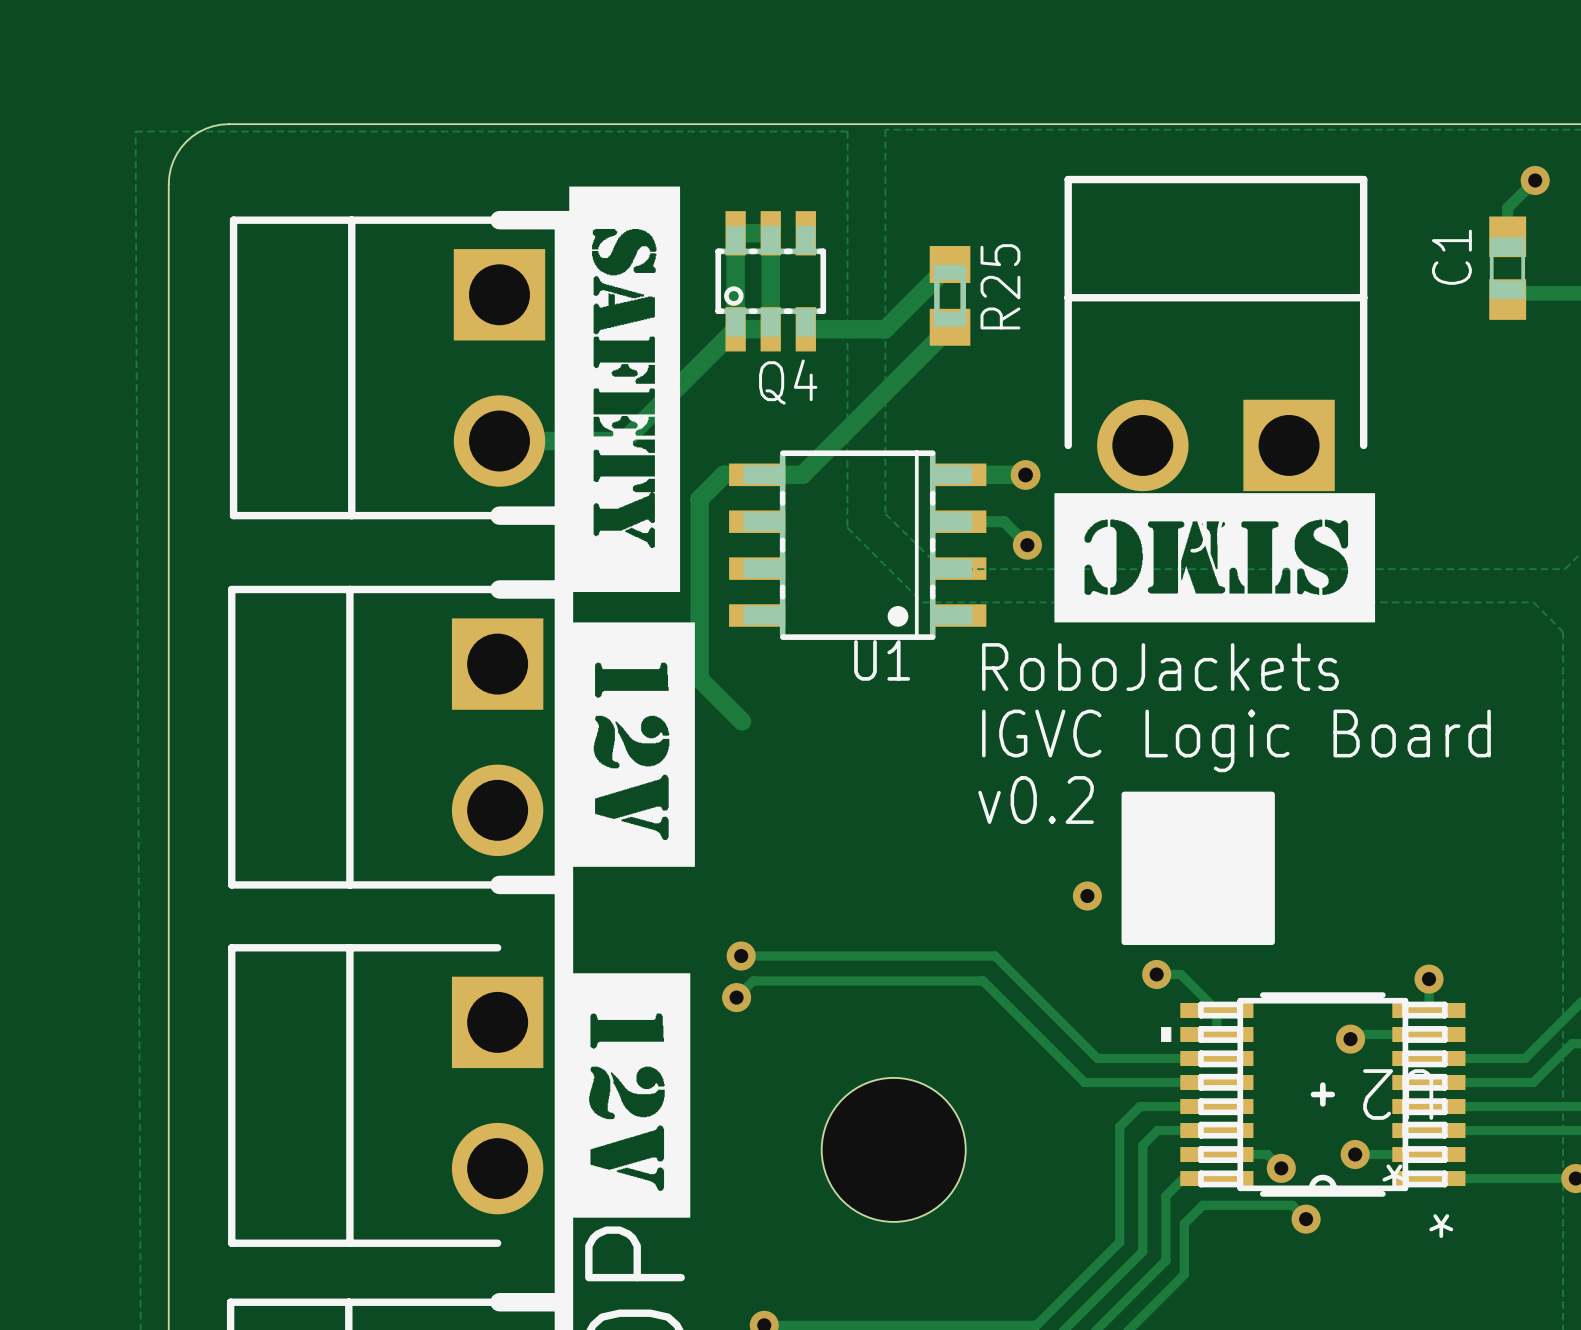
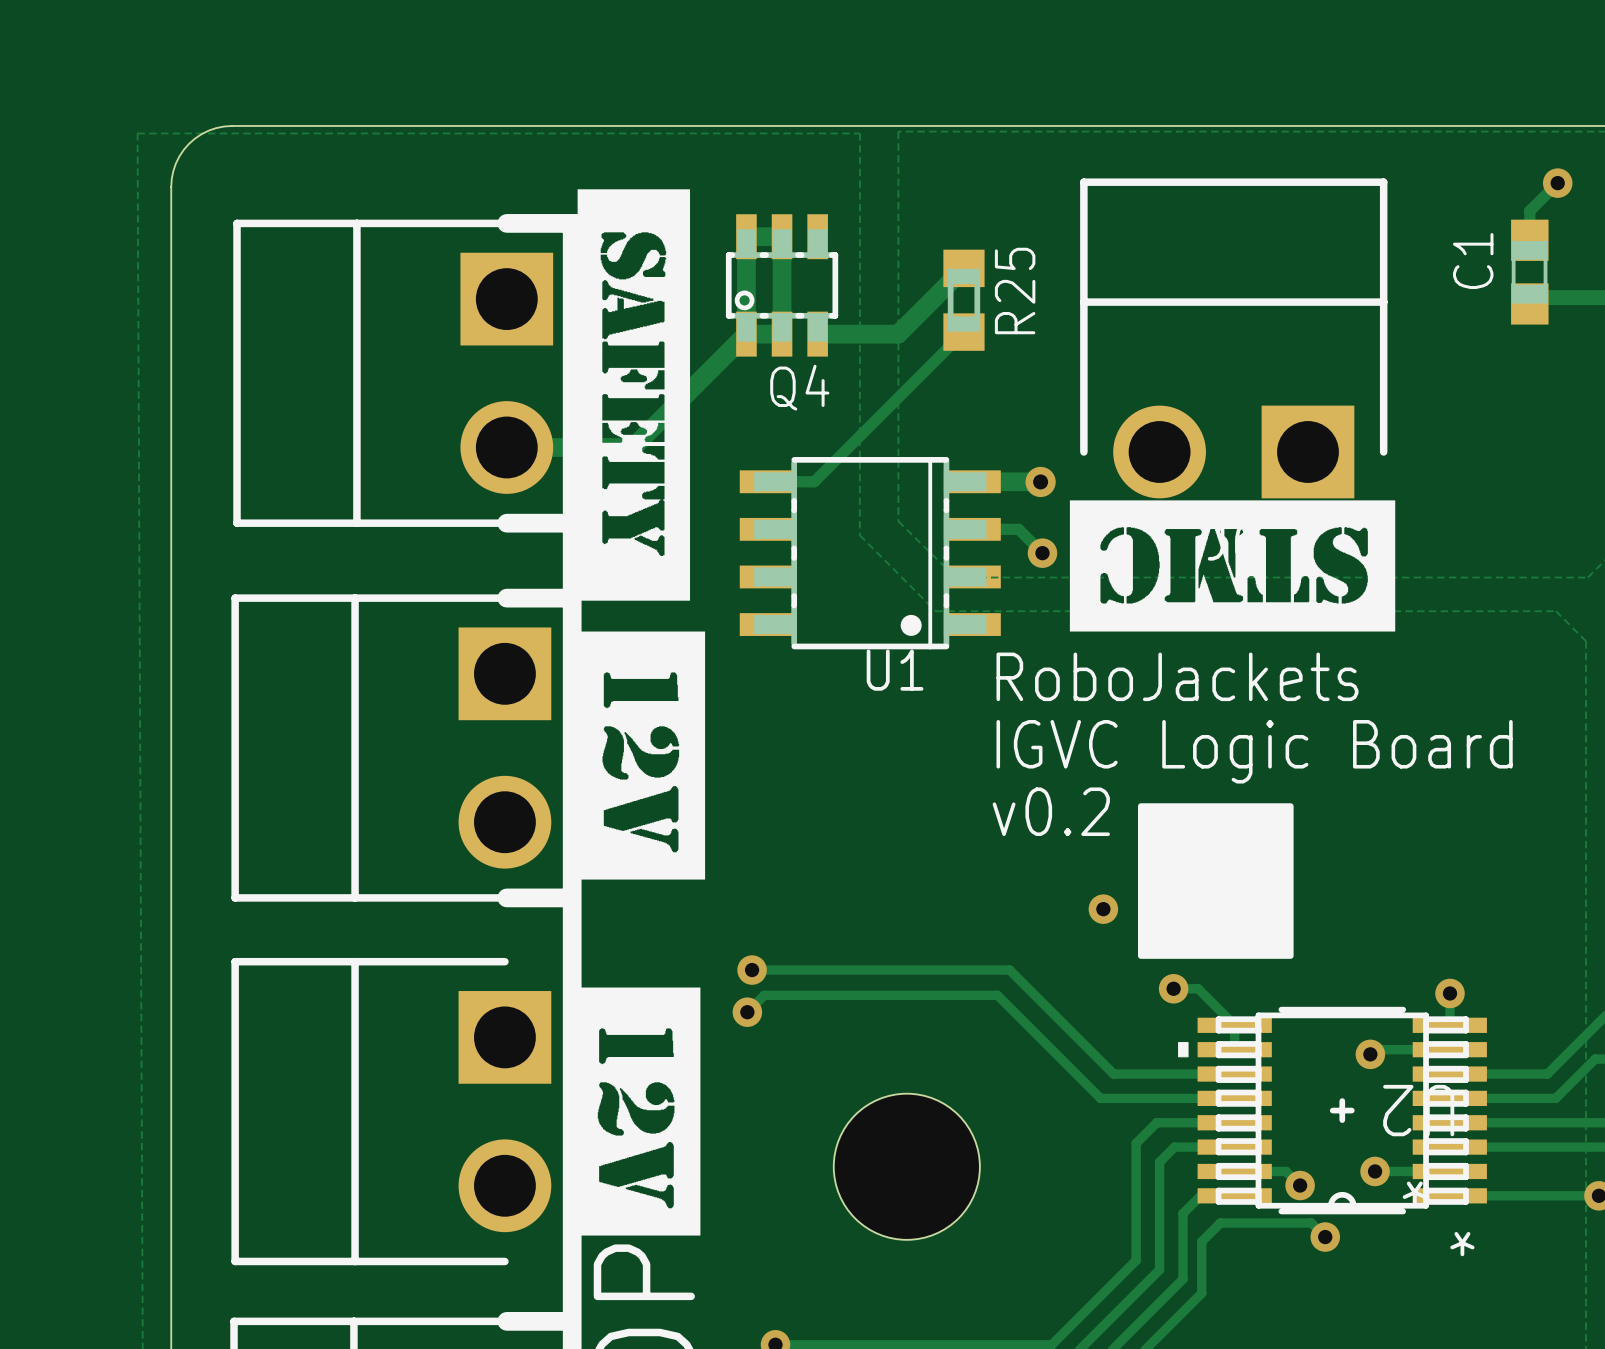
track width: thick (950, 327) (802, 474) (757, 474) -> thin (963, 332) (814, 481) (768, 481)
track: (757, 474) (723, 474) (699, 499) (699, 679) (742, 721) -> none

